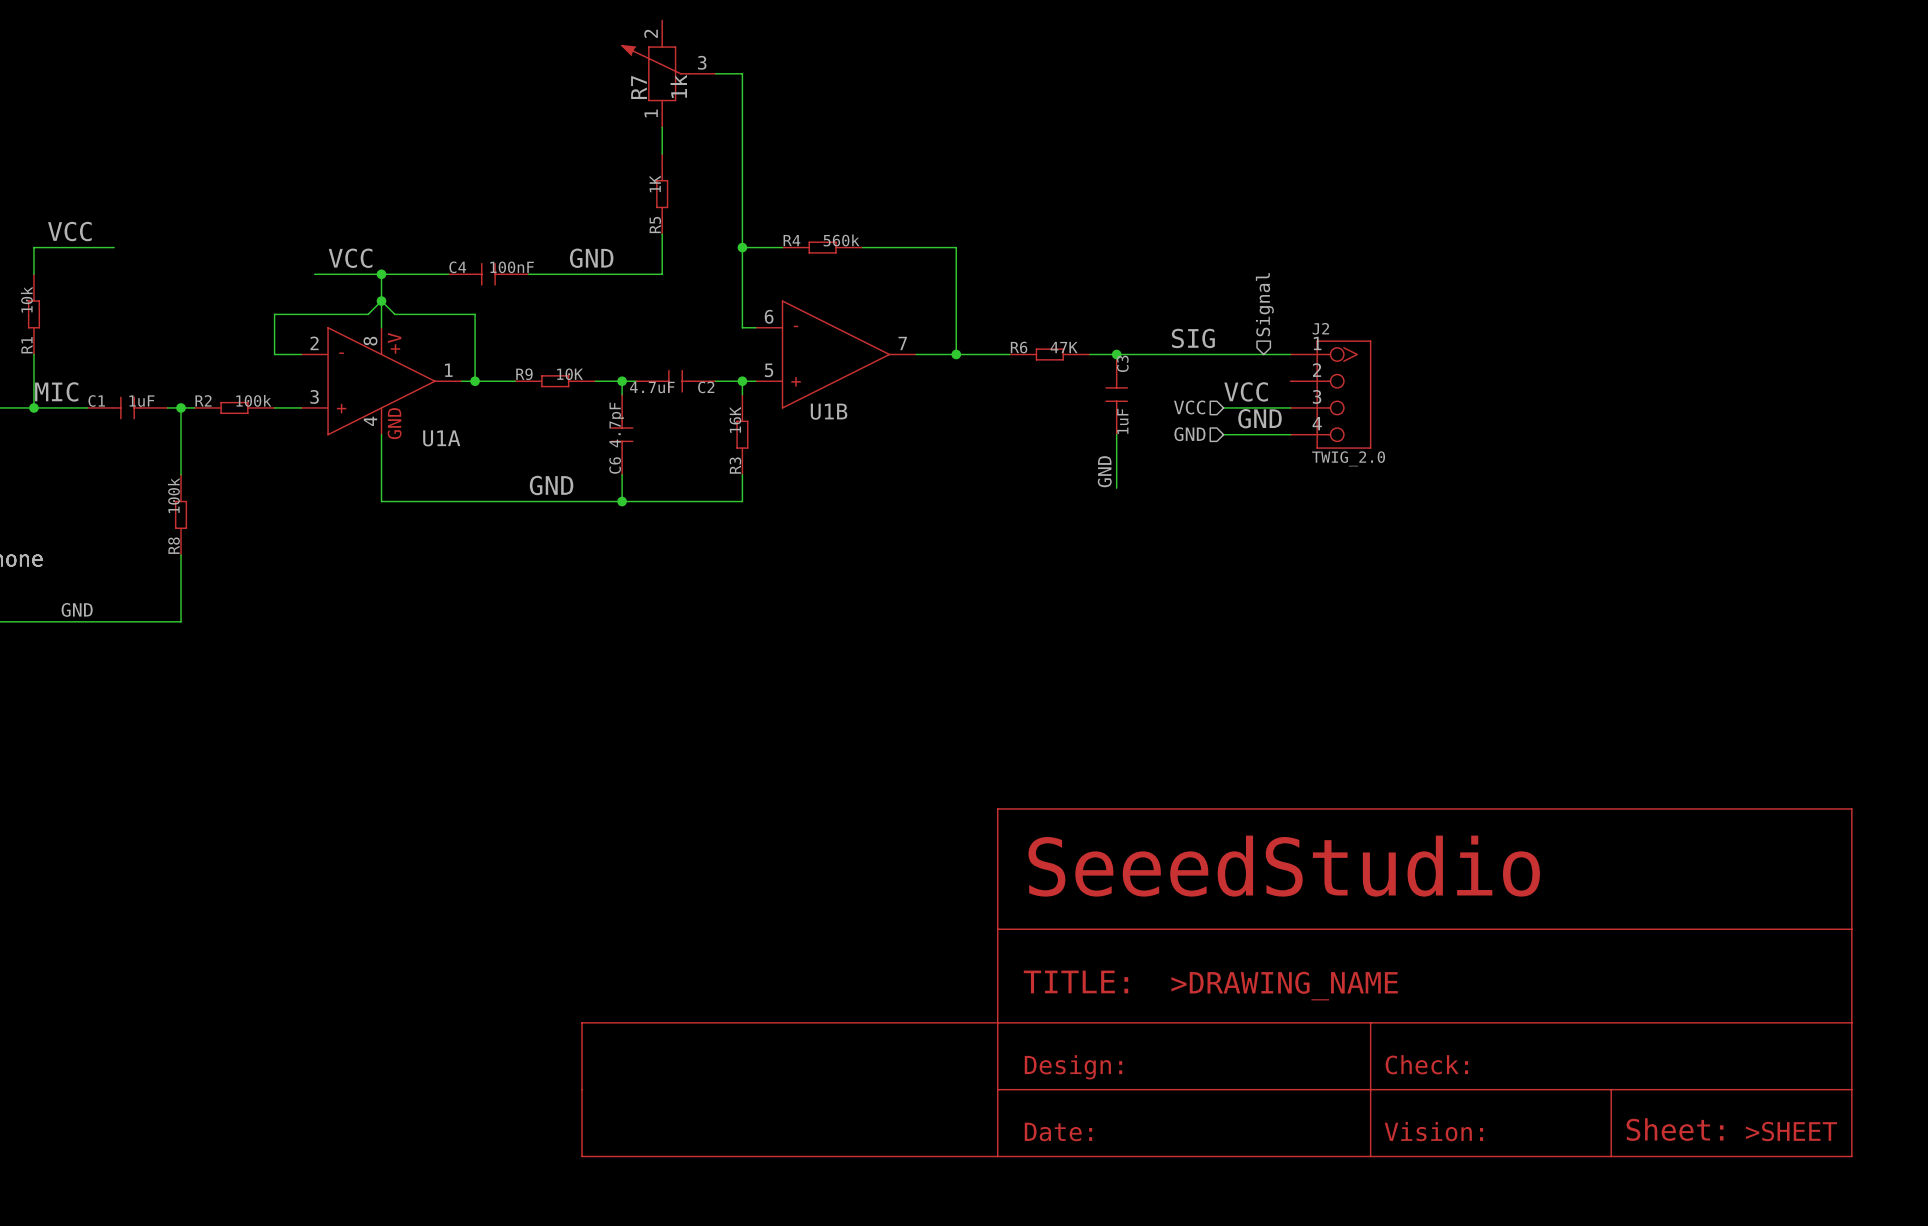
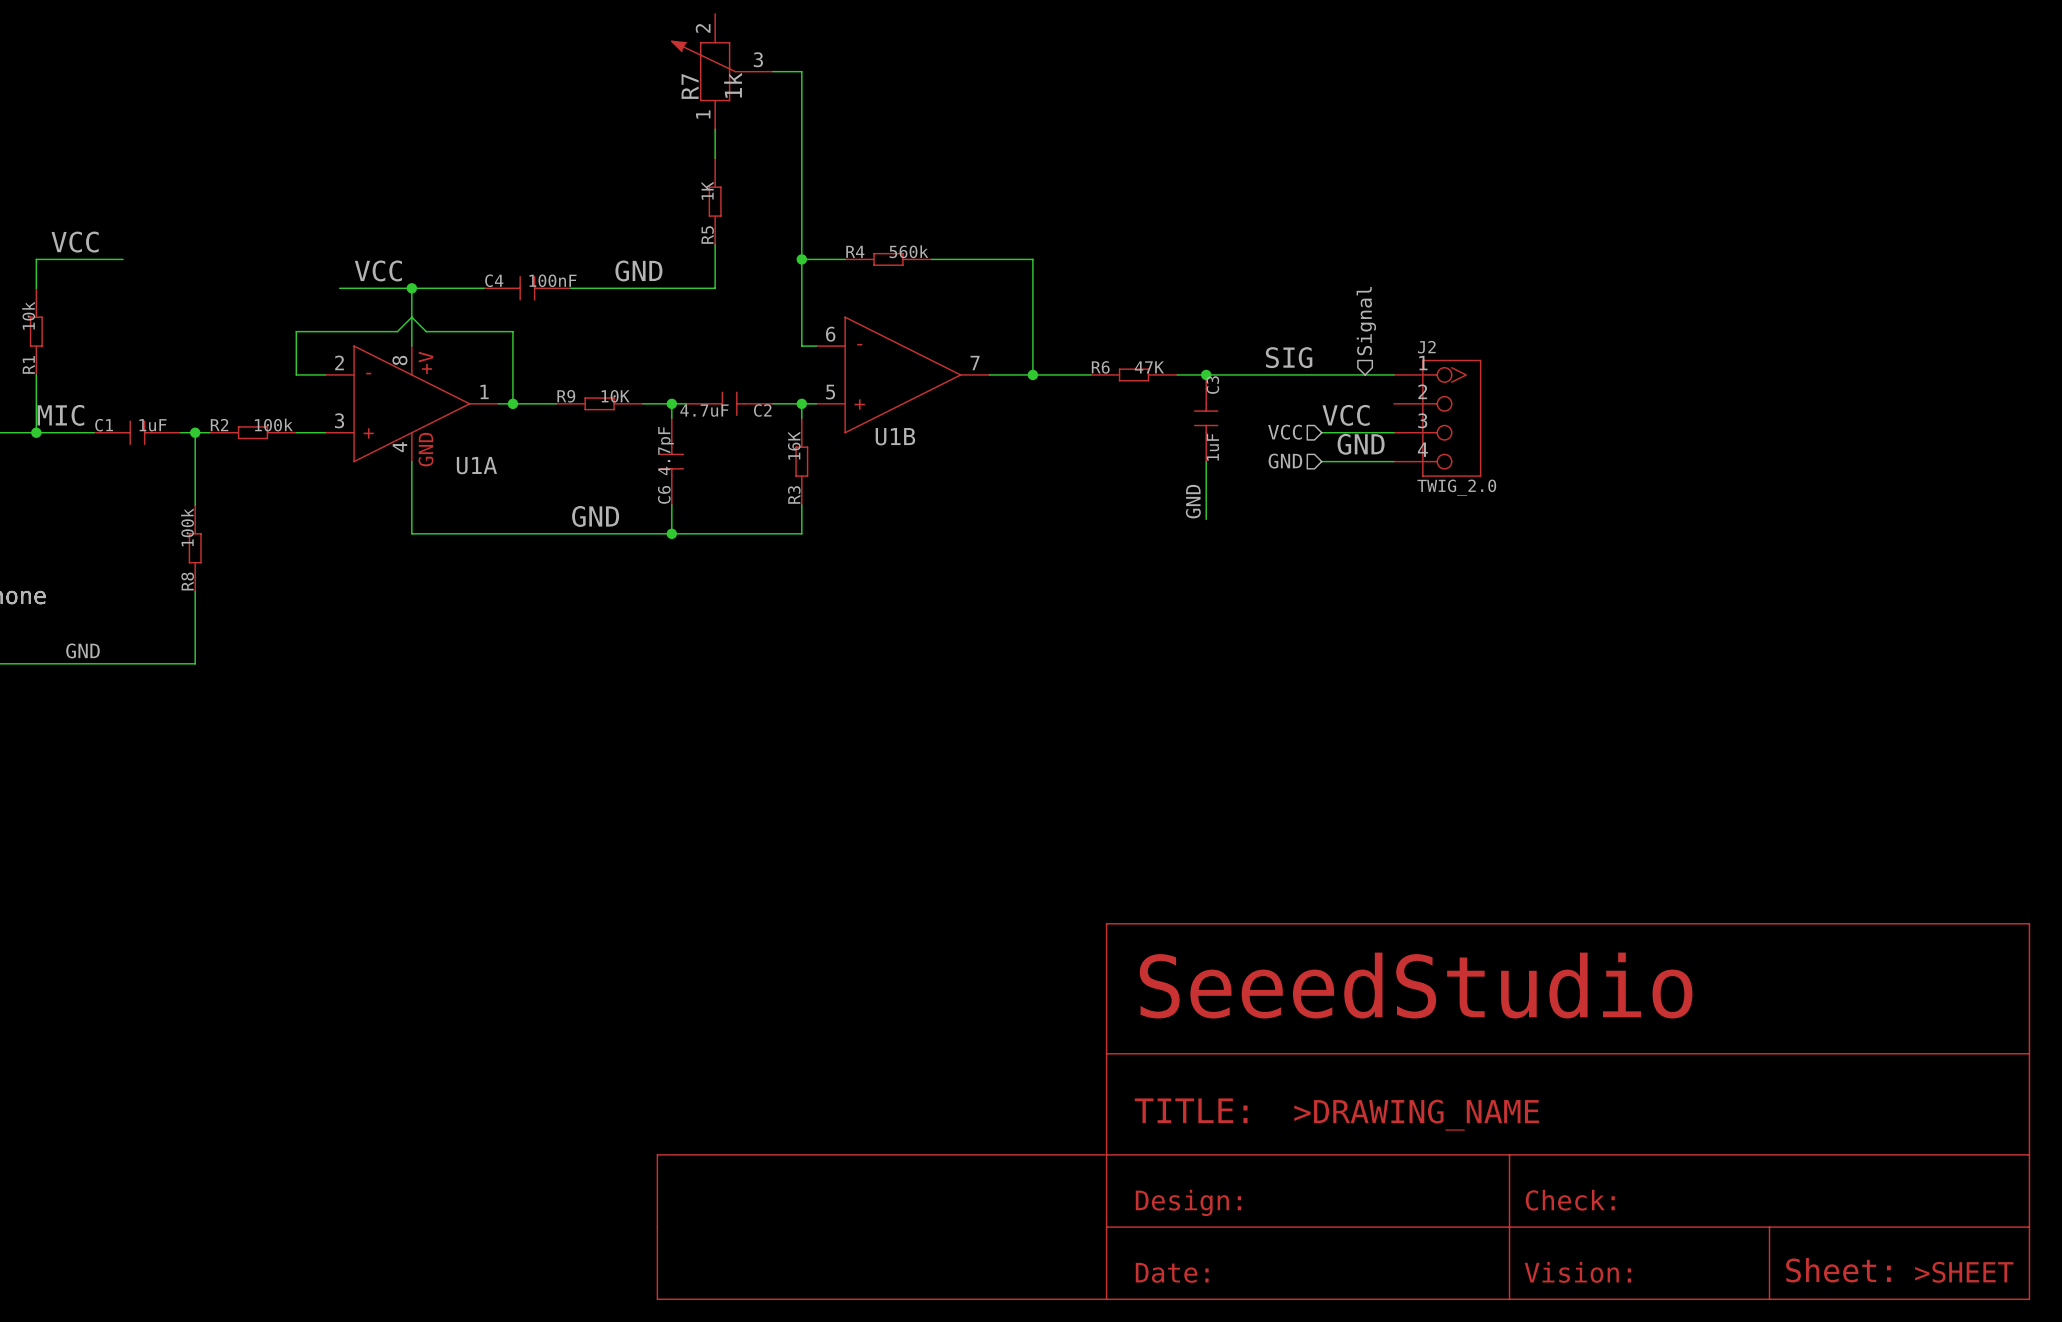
junction: (381, 301) -> none
power symbol position: (1216, 982) -> (1343, 1111)

